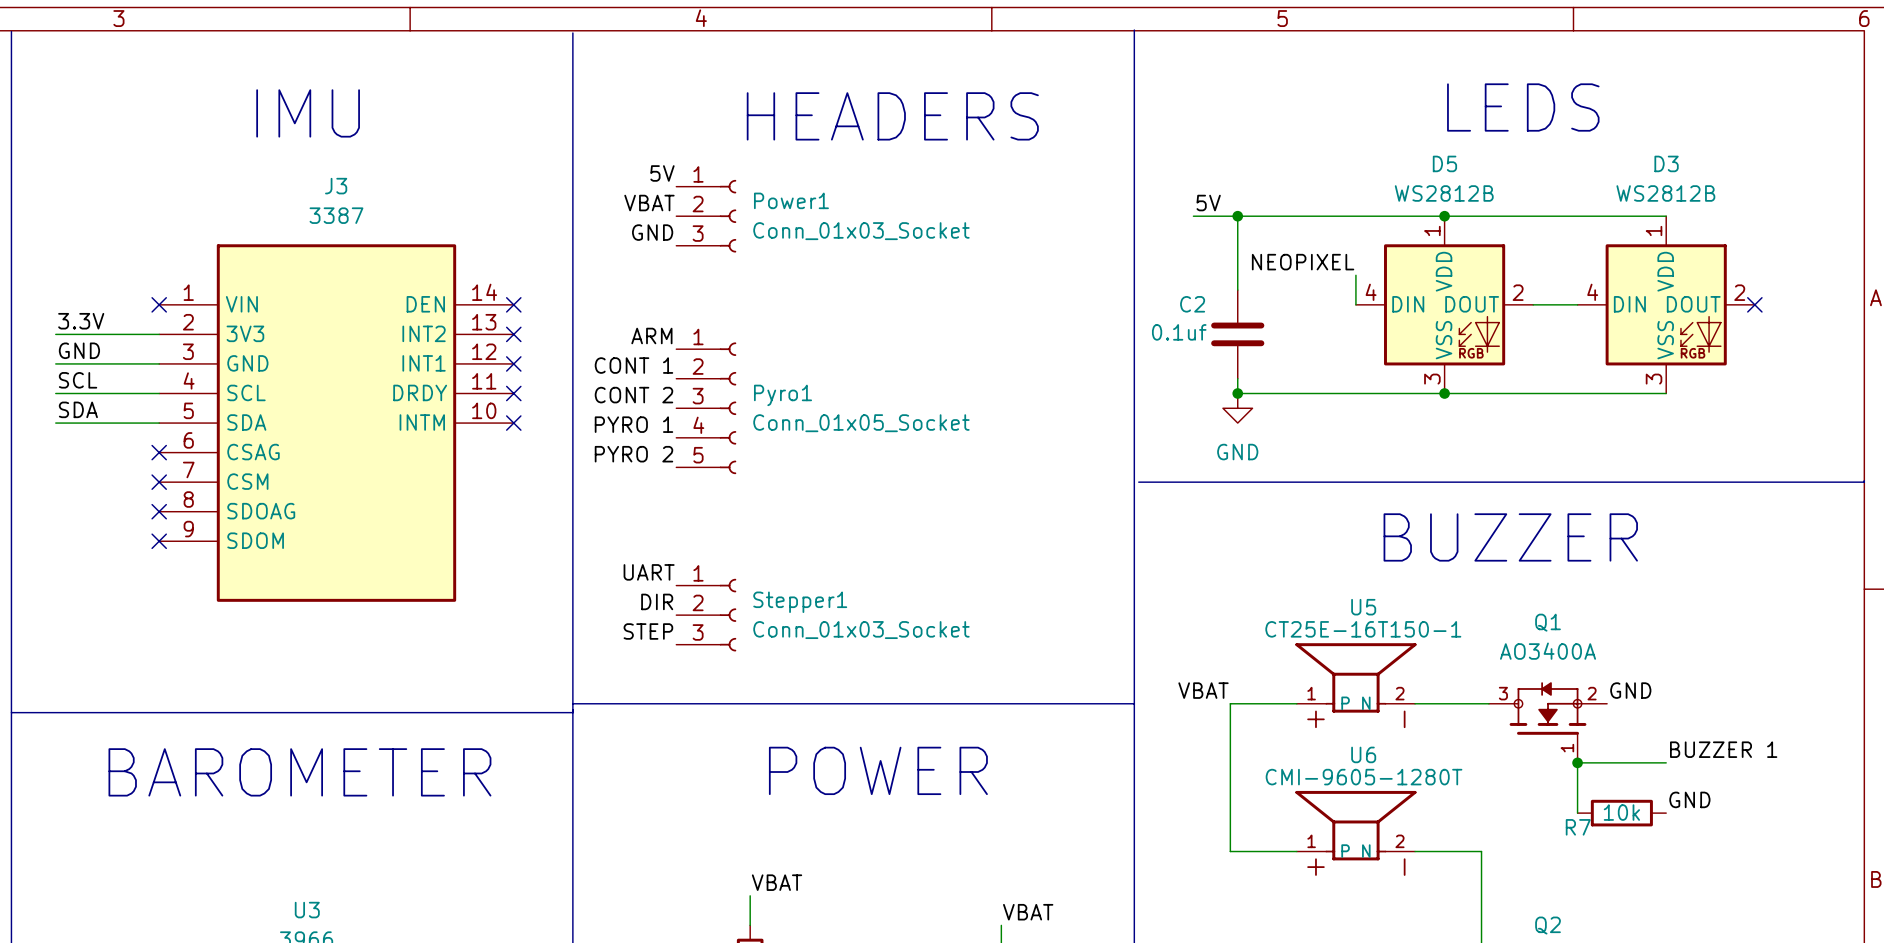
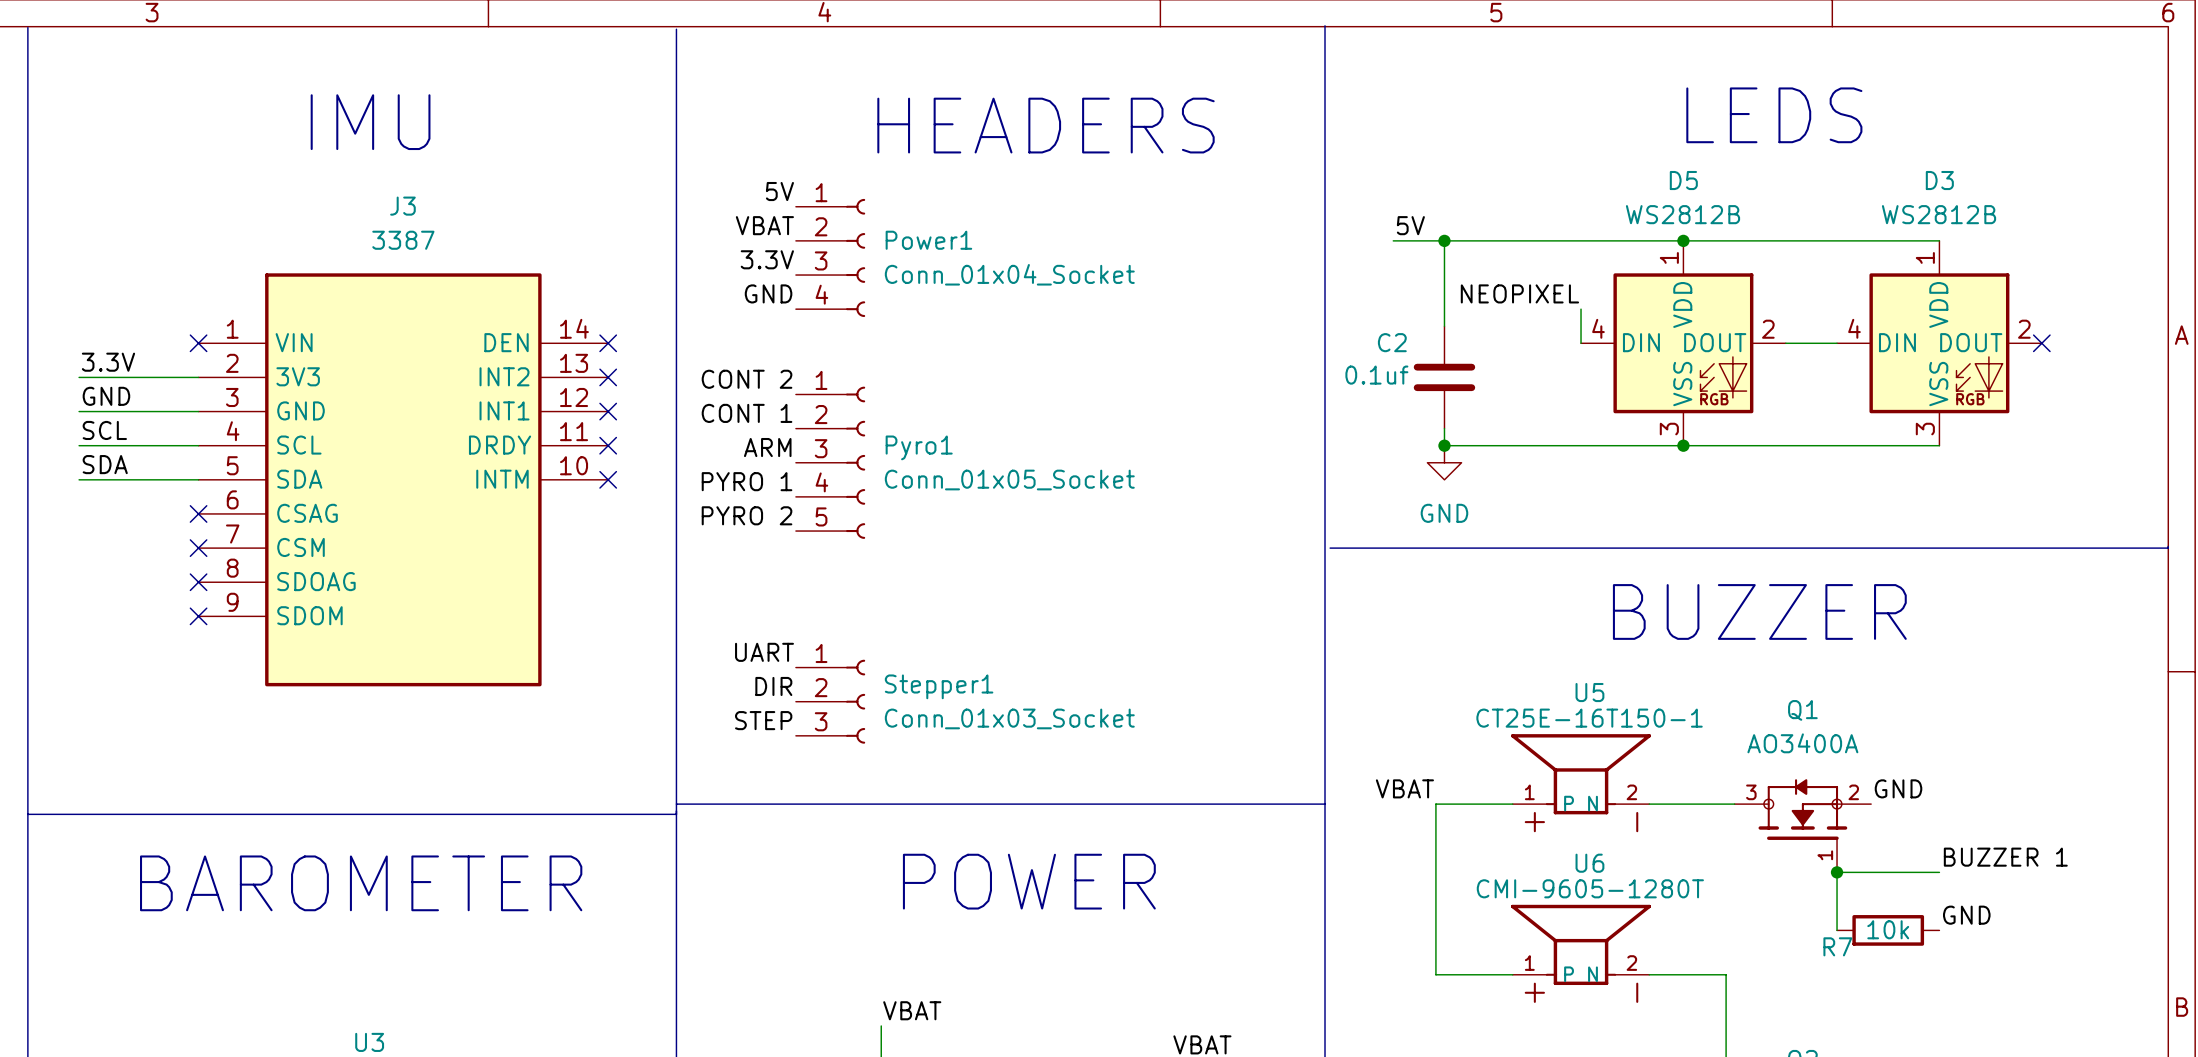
Power1 symbol: [676, 179, 737, 253] -> [795, 198, 866, 318]
Power1 value: Conn_01x03_Socket (861, 231) -> Conn_01x04_Socket (1009, 274)
label: GND (652, 232) -> 3.3V (767, 259)
label: none -> GND (768, 293)
label: ARM (651, 335) -> CONT 2 (747, 379)
label: CONT 2 (633, 395) -> ARM (767, 447)

